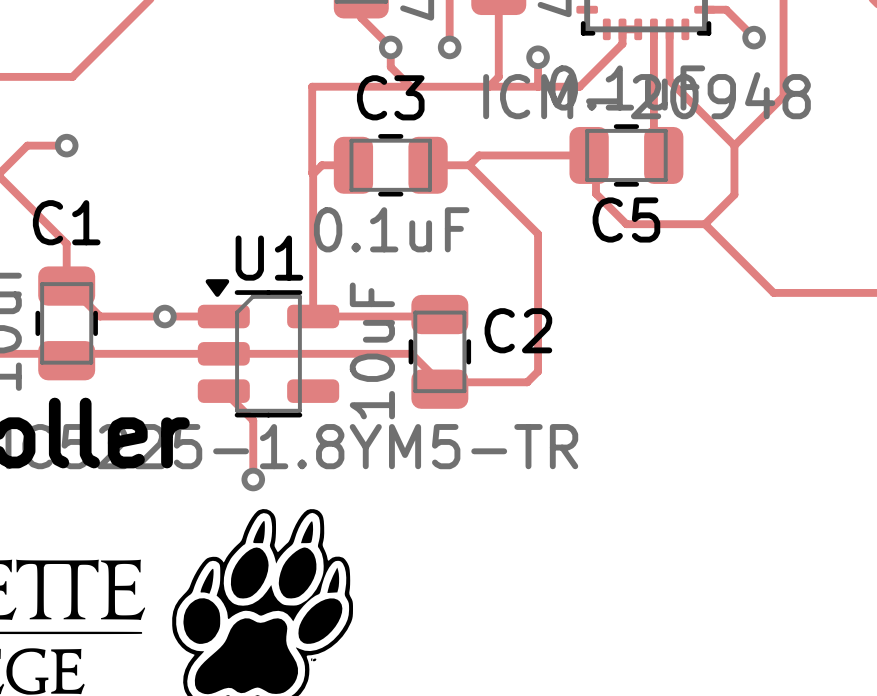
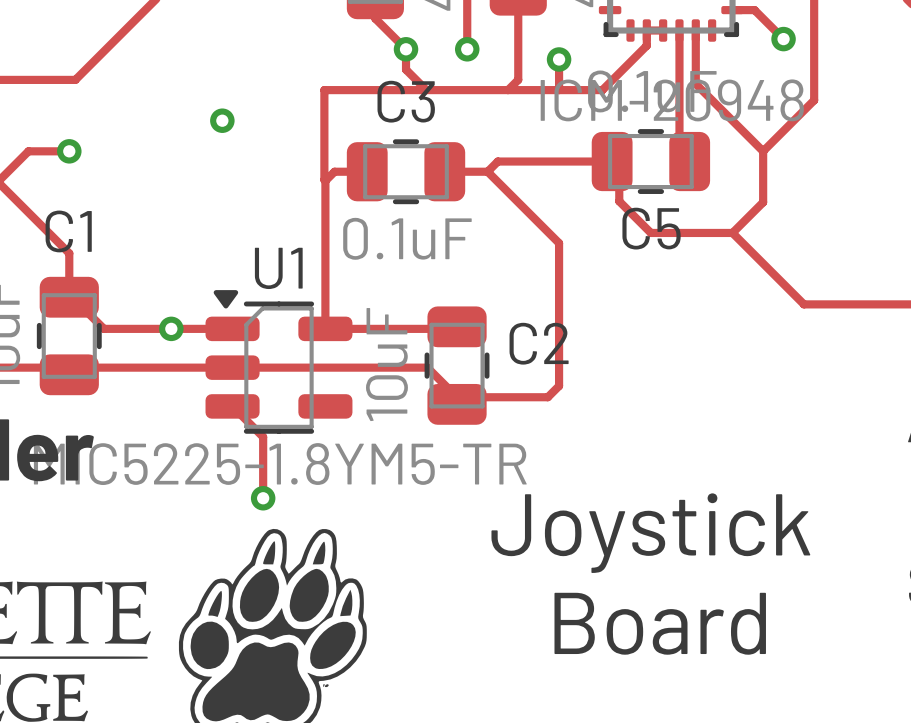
via: none -> (222, 120)
text: none -> Joystick (650, 533)
text: none -> Board (660, 623)

